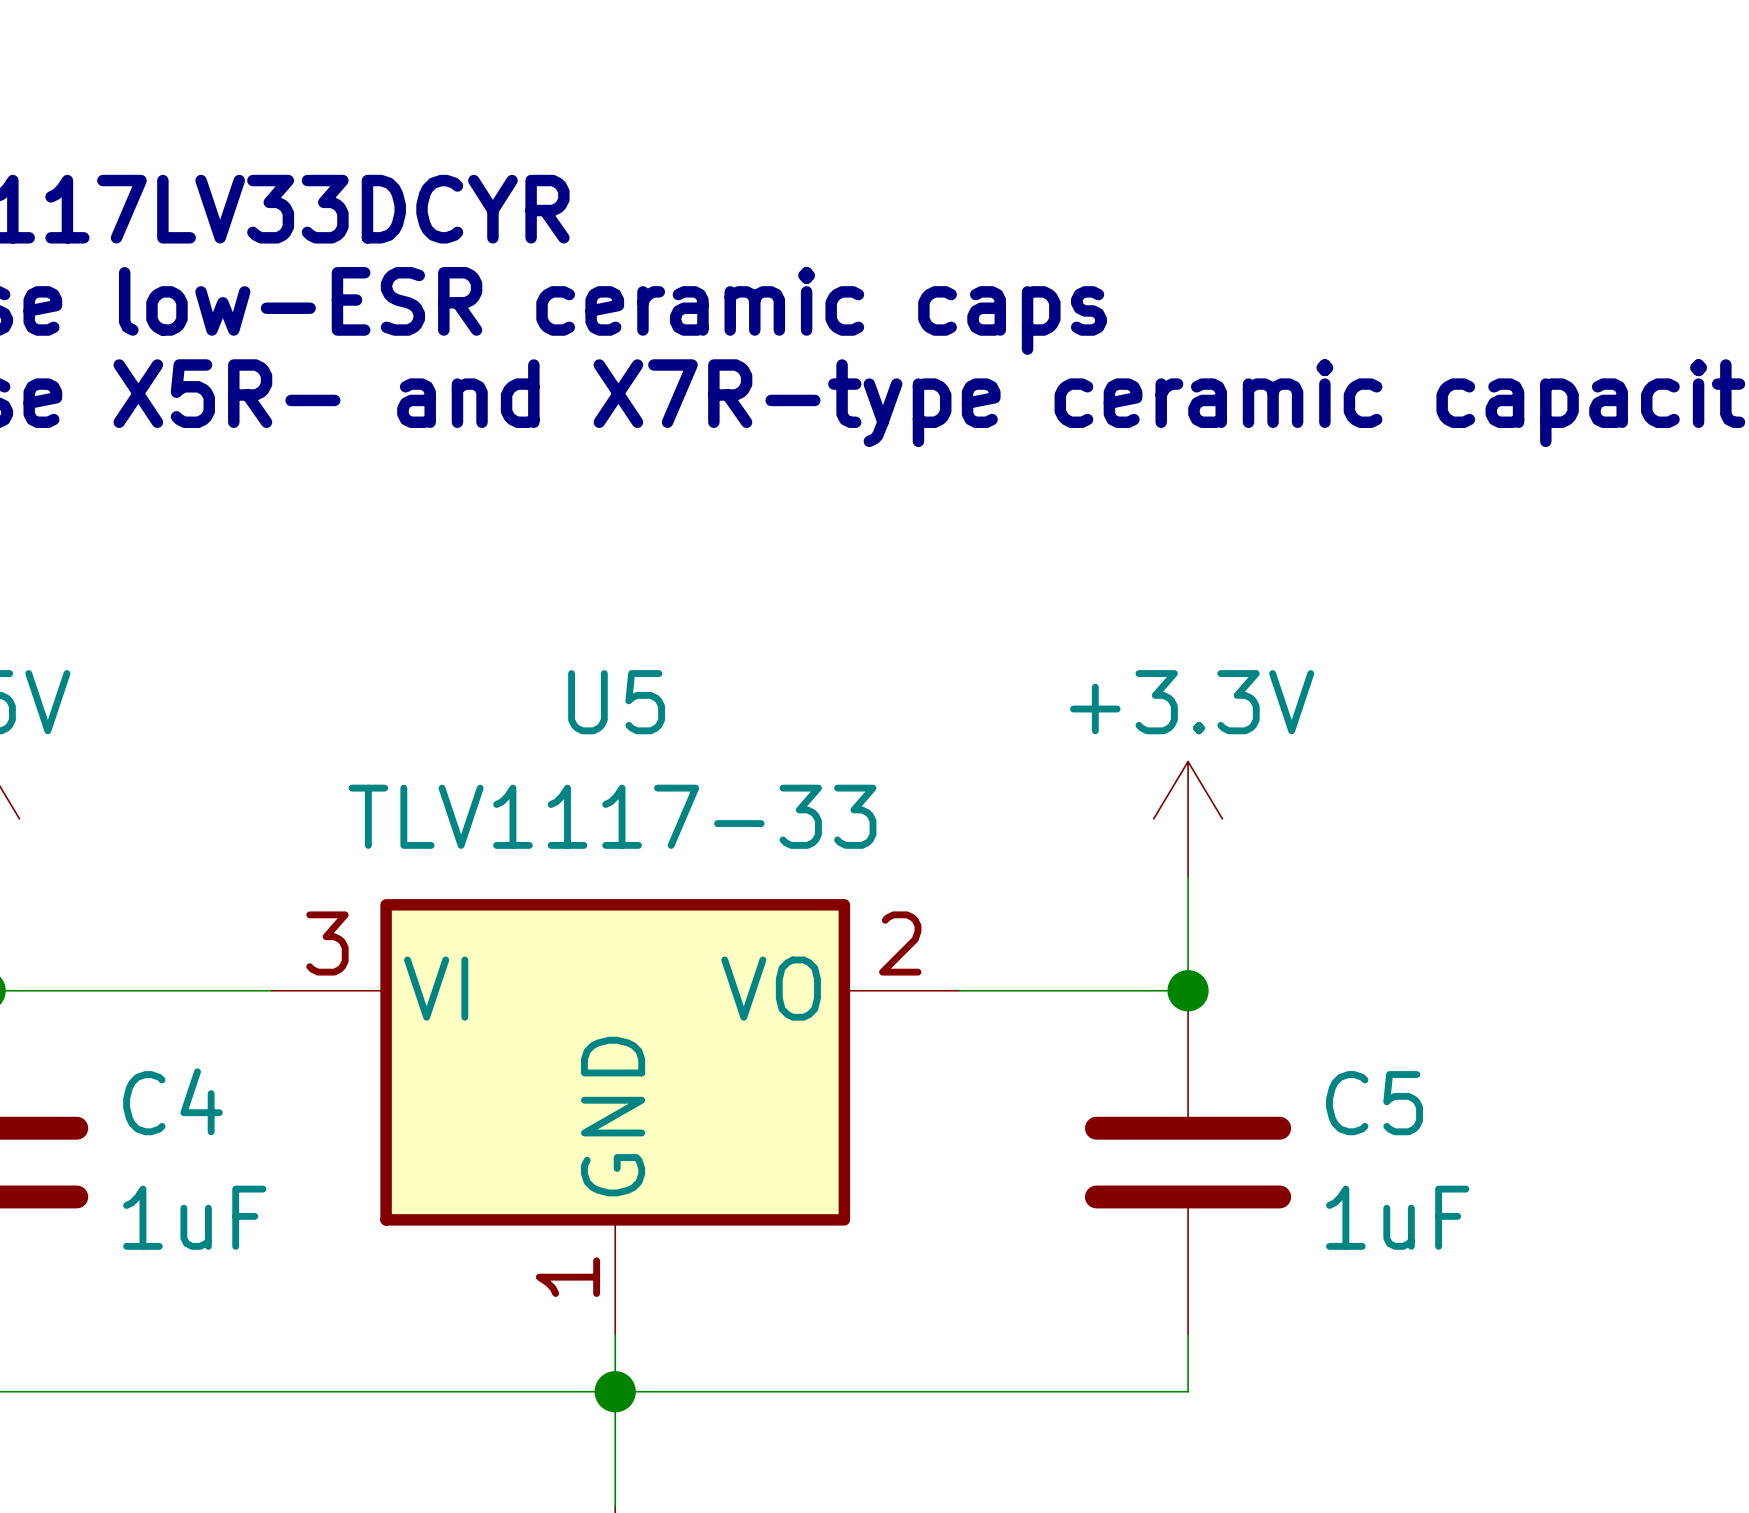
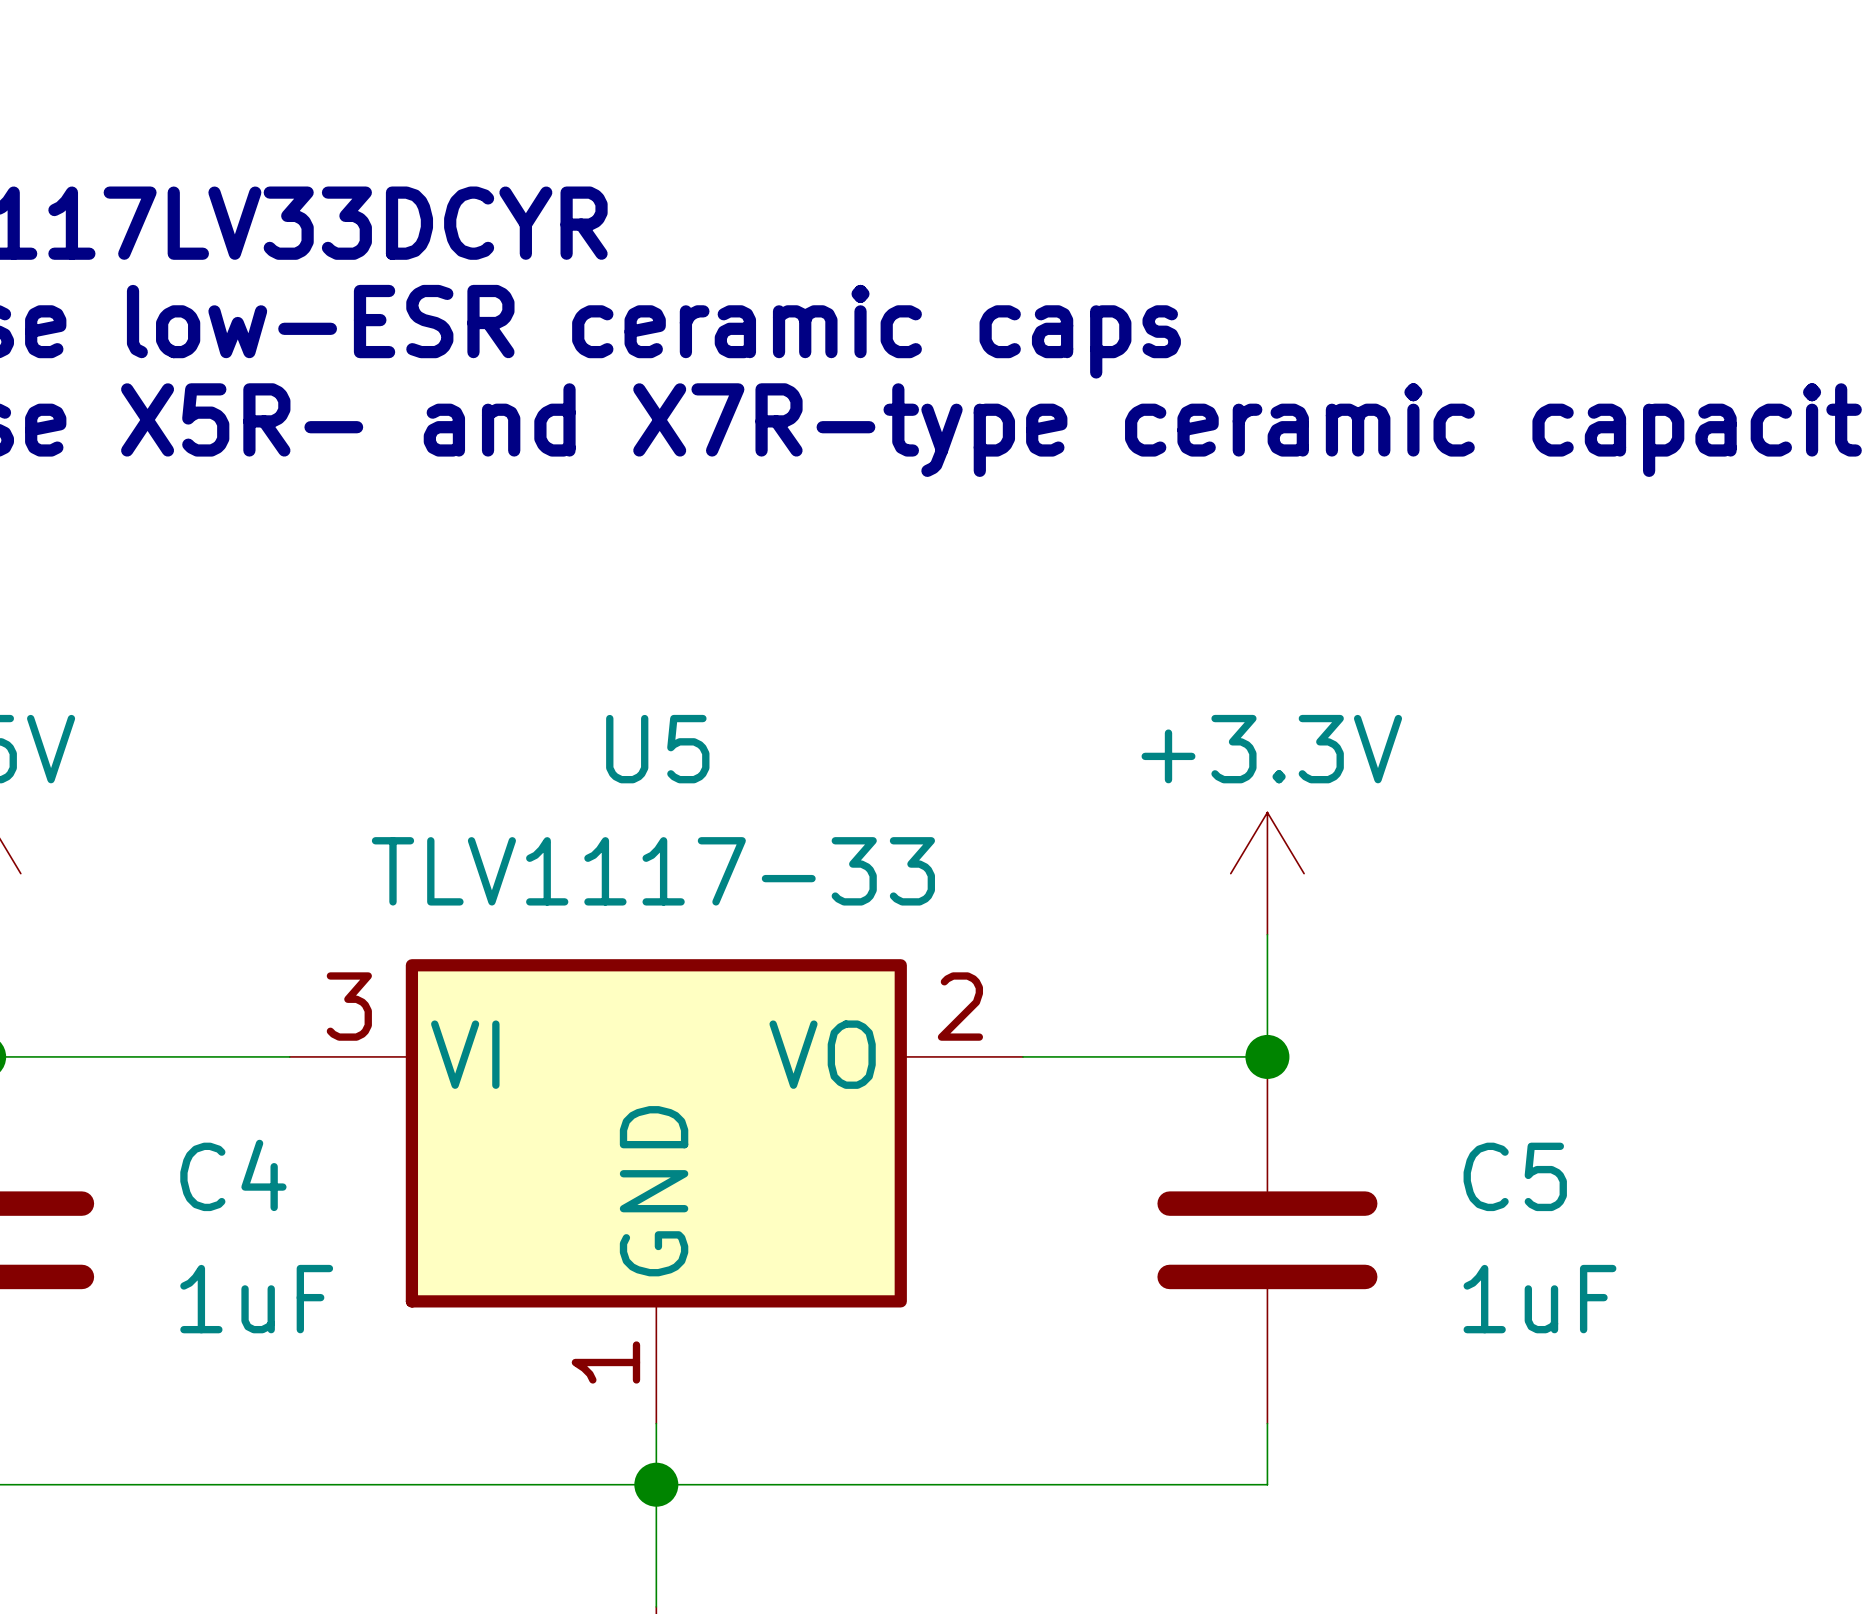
C4 name position: C4 (172, 1101) -> C4 (233, 1175)
C5 name position: C5 (1374, 1103) -> C5 (1515, 1176)
C4 value position: 1uF (194, 1217) -> 1uF (256, 1299)
C5 value position: 1uF (1397, 1217) -> 1uF (1539, 1299)

